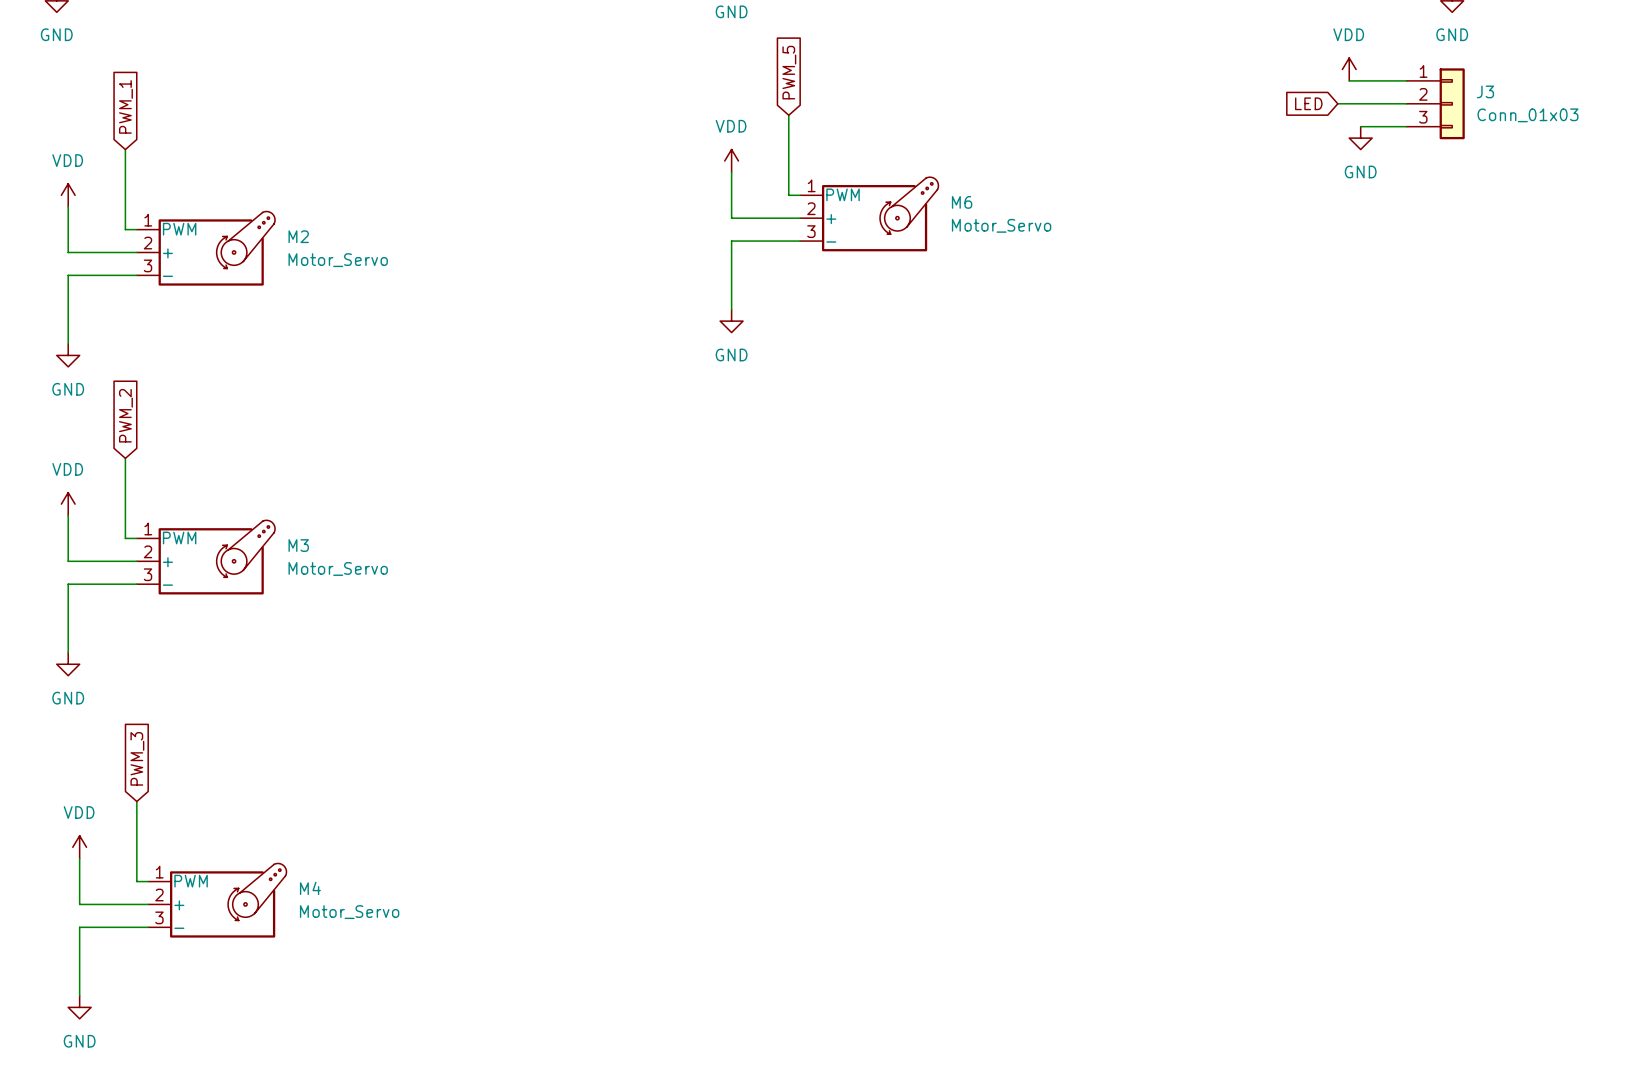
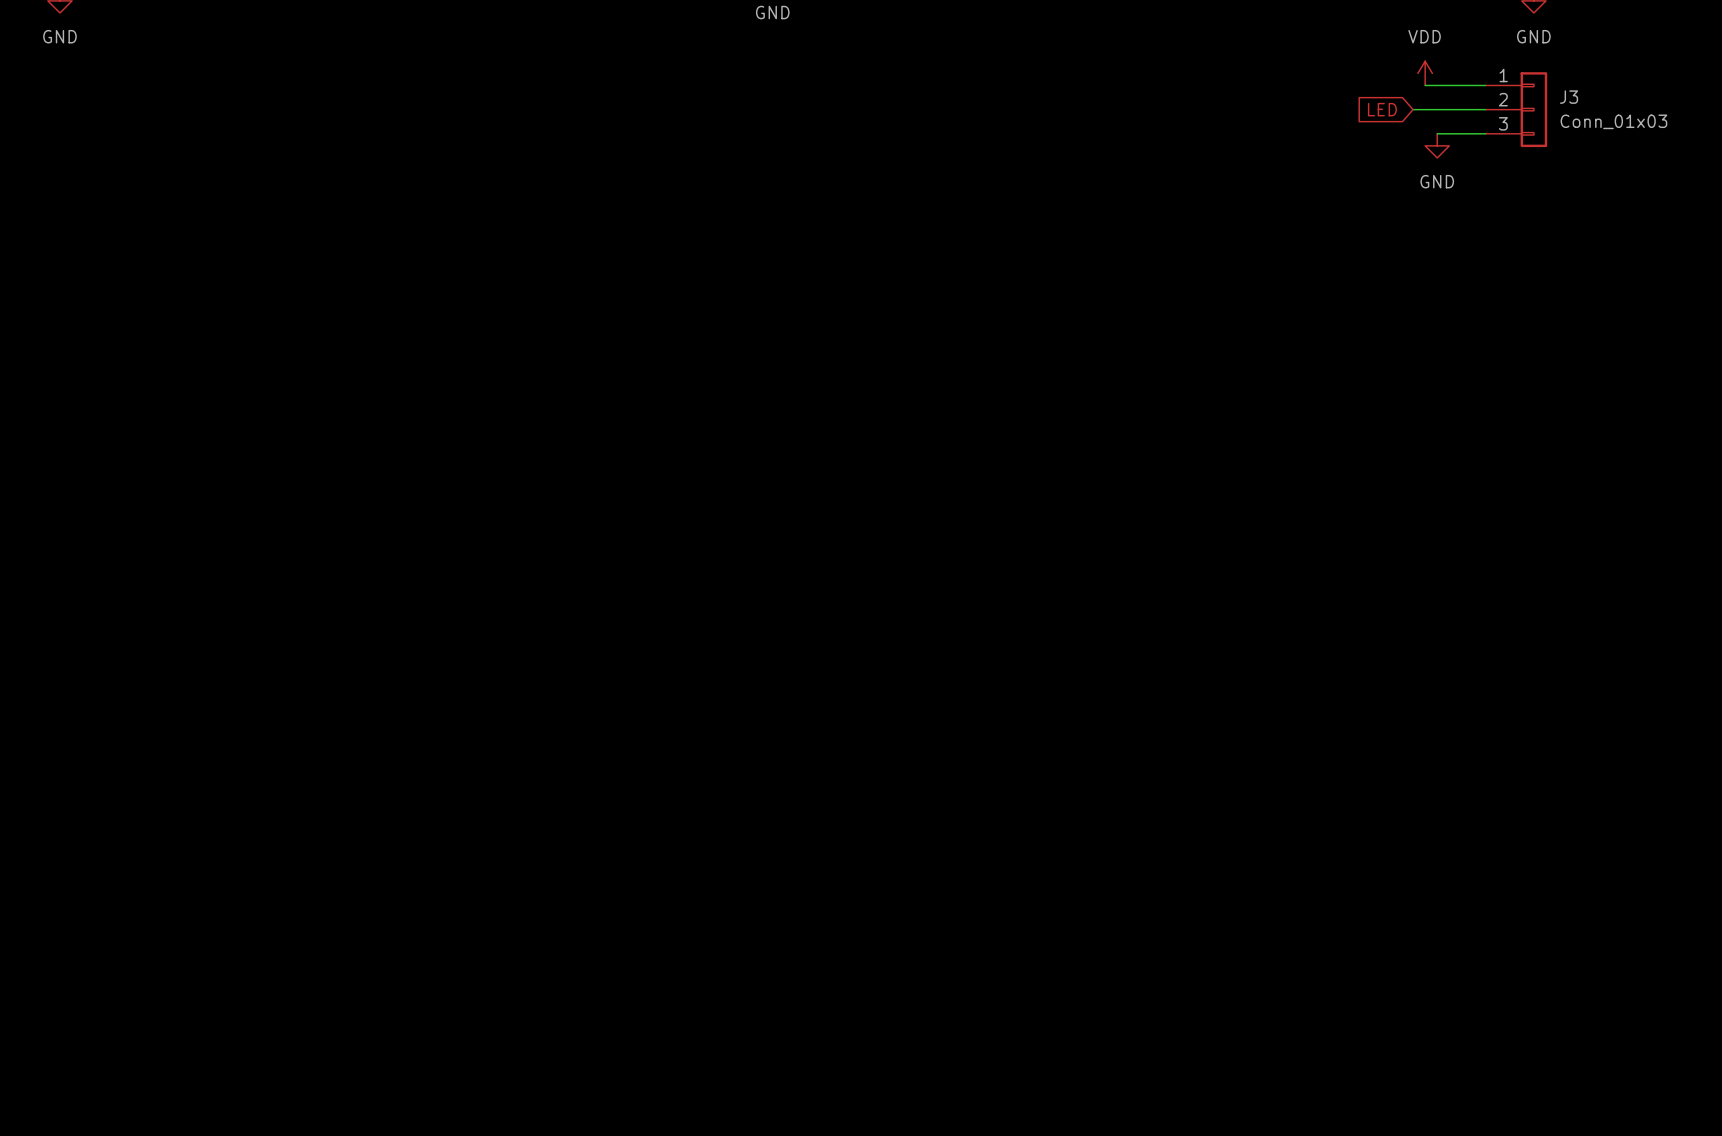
global label: PWM_5 (789, 72) -> none
global label: PWM_1 (125, 106) -> none
wire: (788, 115) (788, 195) (800, 195) -> none
wire: (125, 149) (125, 229) (136, 229) -> none
power symbol: VDD (731, 160) -> none
wire: (731, 172) (731, 218) (800, 218) -> none
power symbol: VDD (68, 195) -> none
wire: (68, 206) (68, 252) (136, 252) -> none
M6: Motor_Servo (869, 214) -> none
wire: (800, 241) (731, 241) (731, 309) -> none
M2: Motor_Servo (205, 248) -> none
wire: (136, 275) (68, 275) (68, 343) -> none
power symbol: GND (731, 321) -> none
power symbol: GND (68, 355) -> none
global label: PWM_2 (125, 415) -> none
wire: (125, 458) (125, 538) (136, 538) -> none
power symbol: VDD (68, 504) -> none
wire: (68, 515) (68, 561) (136, 561) -> none
M3: Motor_Servo (205, 557) -> none
wire: (136, 584) (68, 584) (68, 652) -> none
power symbol: GND (68, 664) -> none
global label: PWM_3 (137, 758) -> none
wire: (136, 801) (136, 881) (148, 881) -> none
power symbol: VDD (79, 847) -> none
wire: (79, 858) (79, 904) (148, 904) -> none
M4: Motor_Servo (217, 900) -> none
wire: (148, 927) (79, 927) (79, 995) -> none
power symbol: GND (79, 1007) -> none

